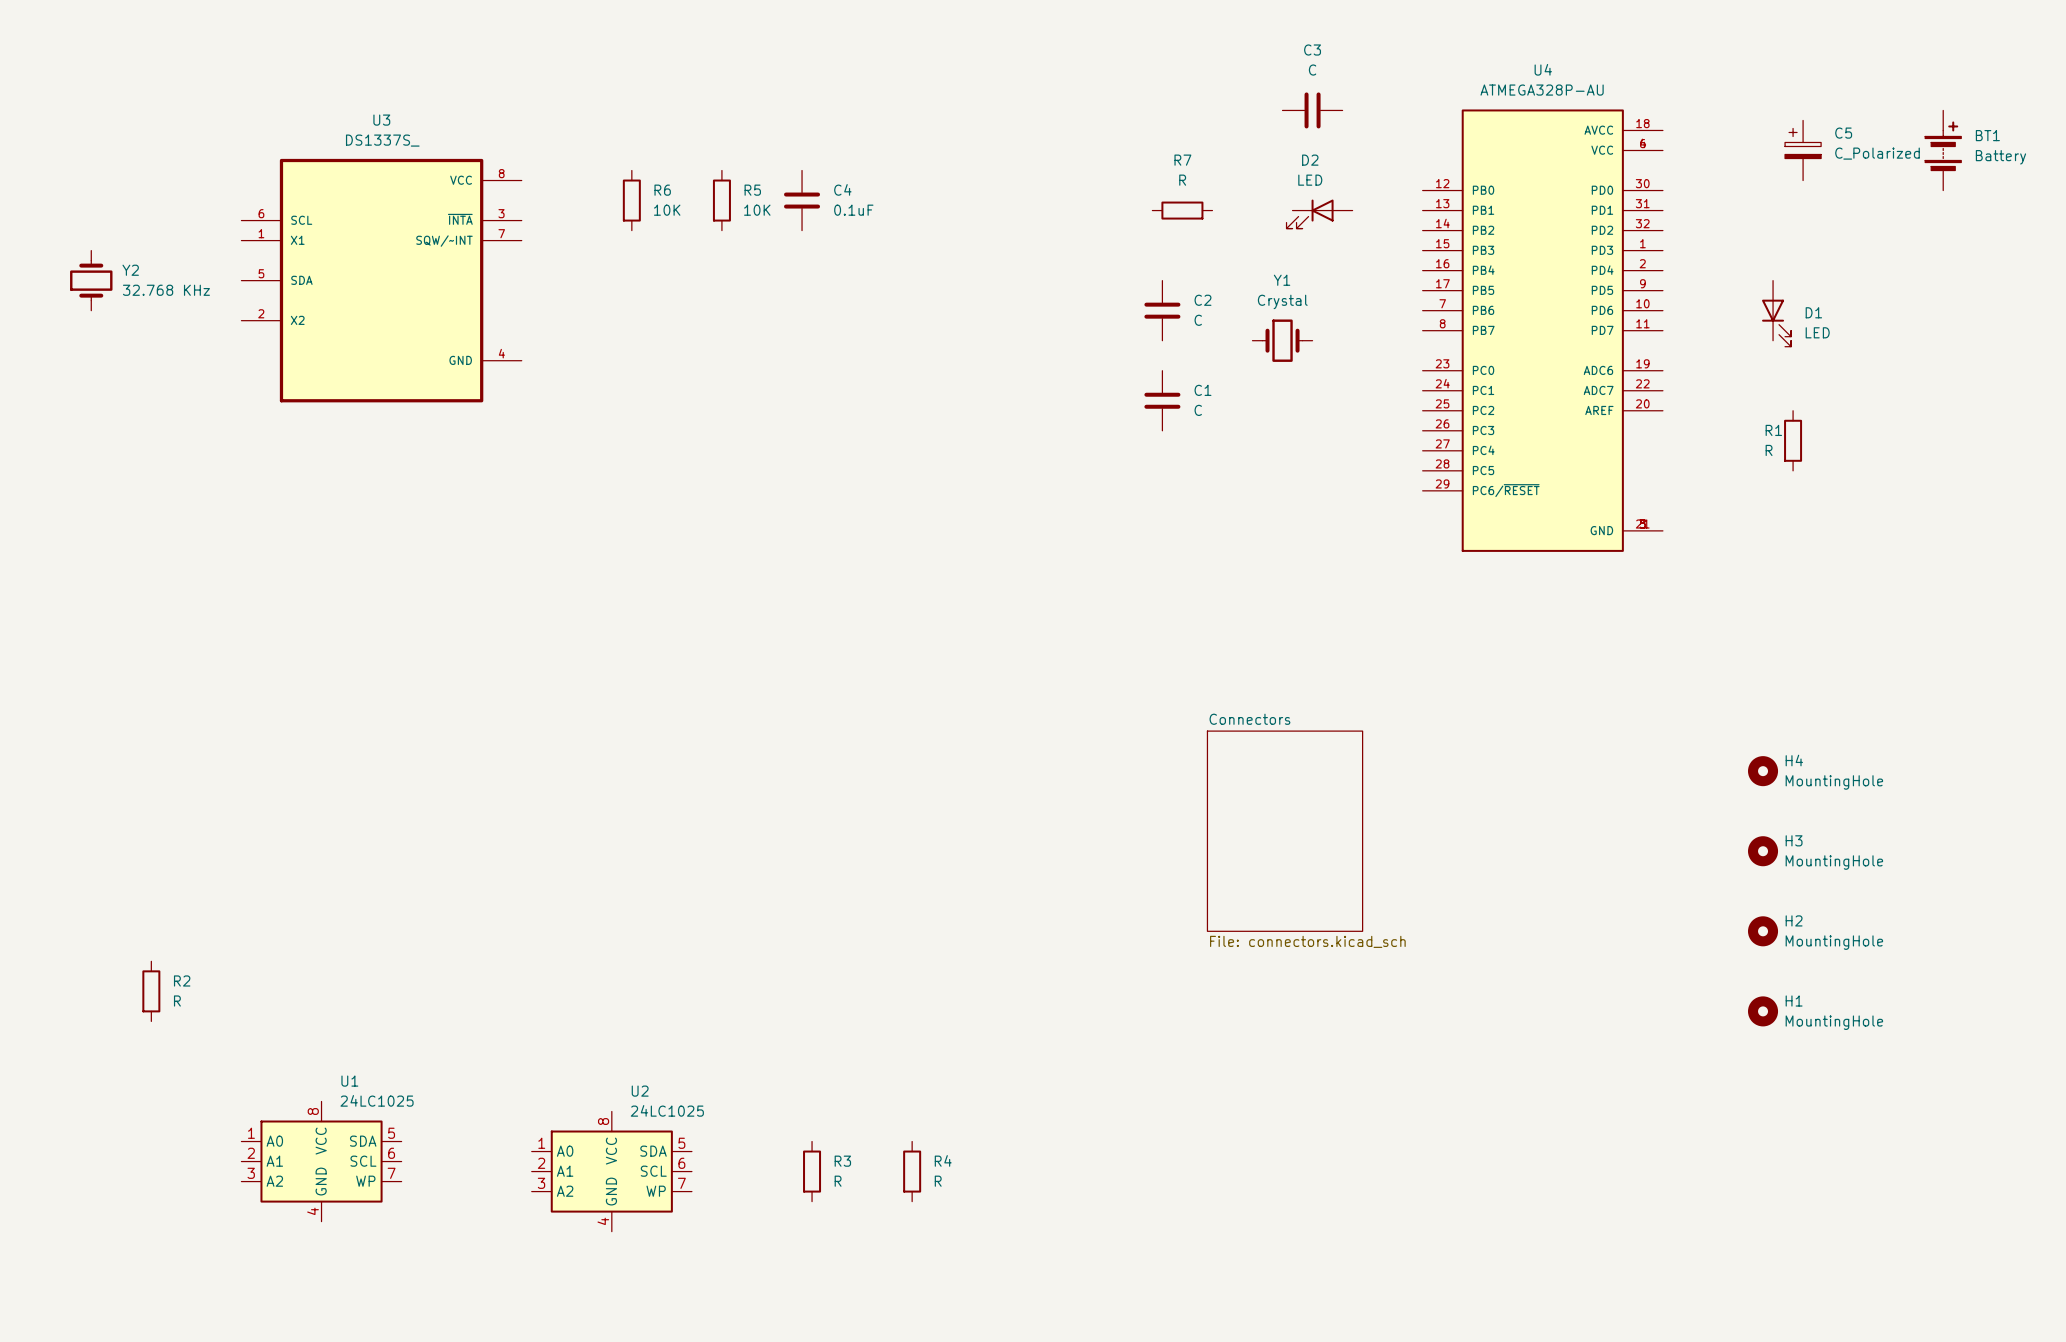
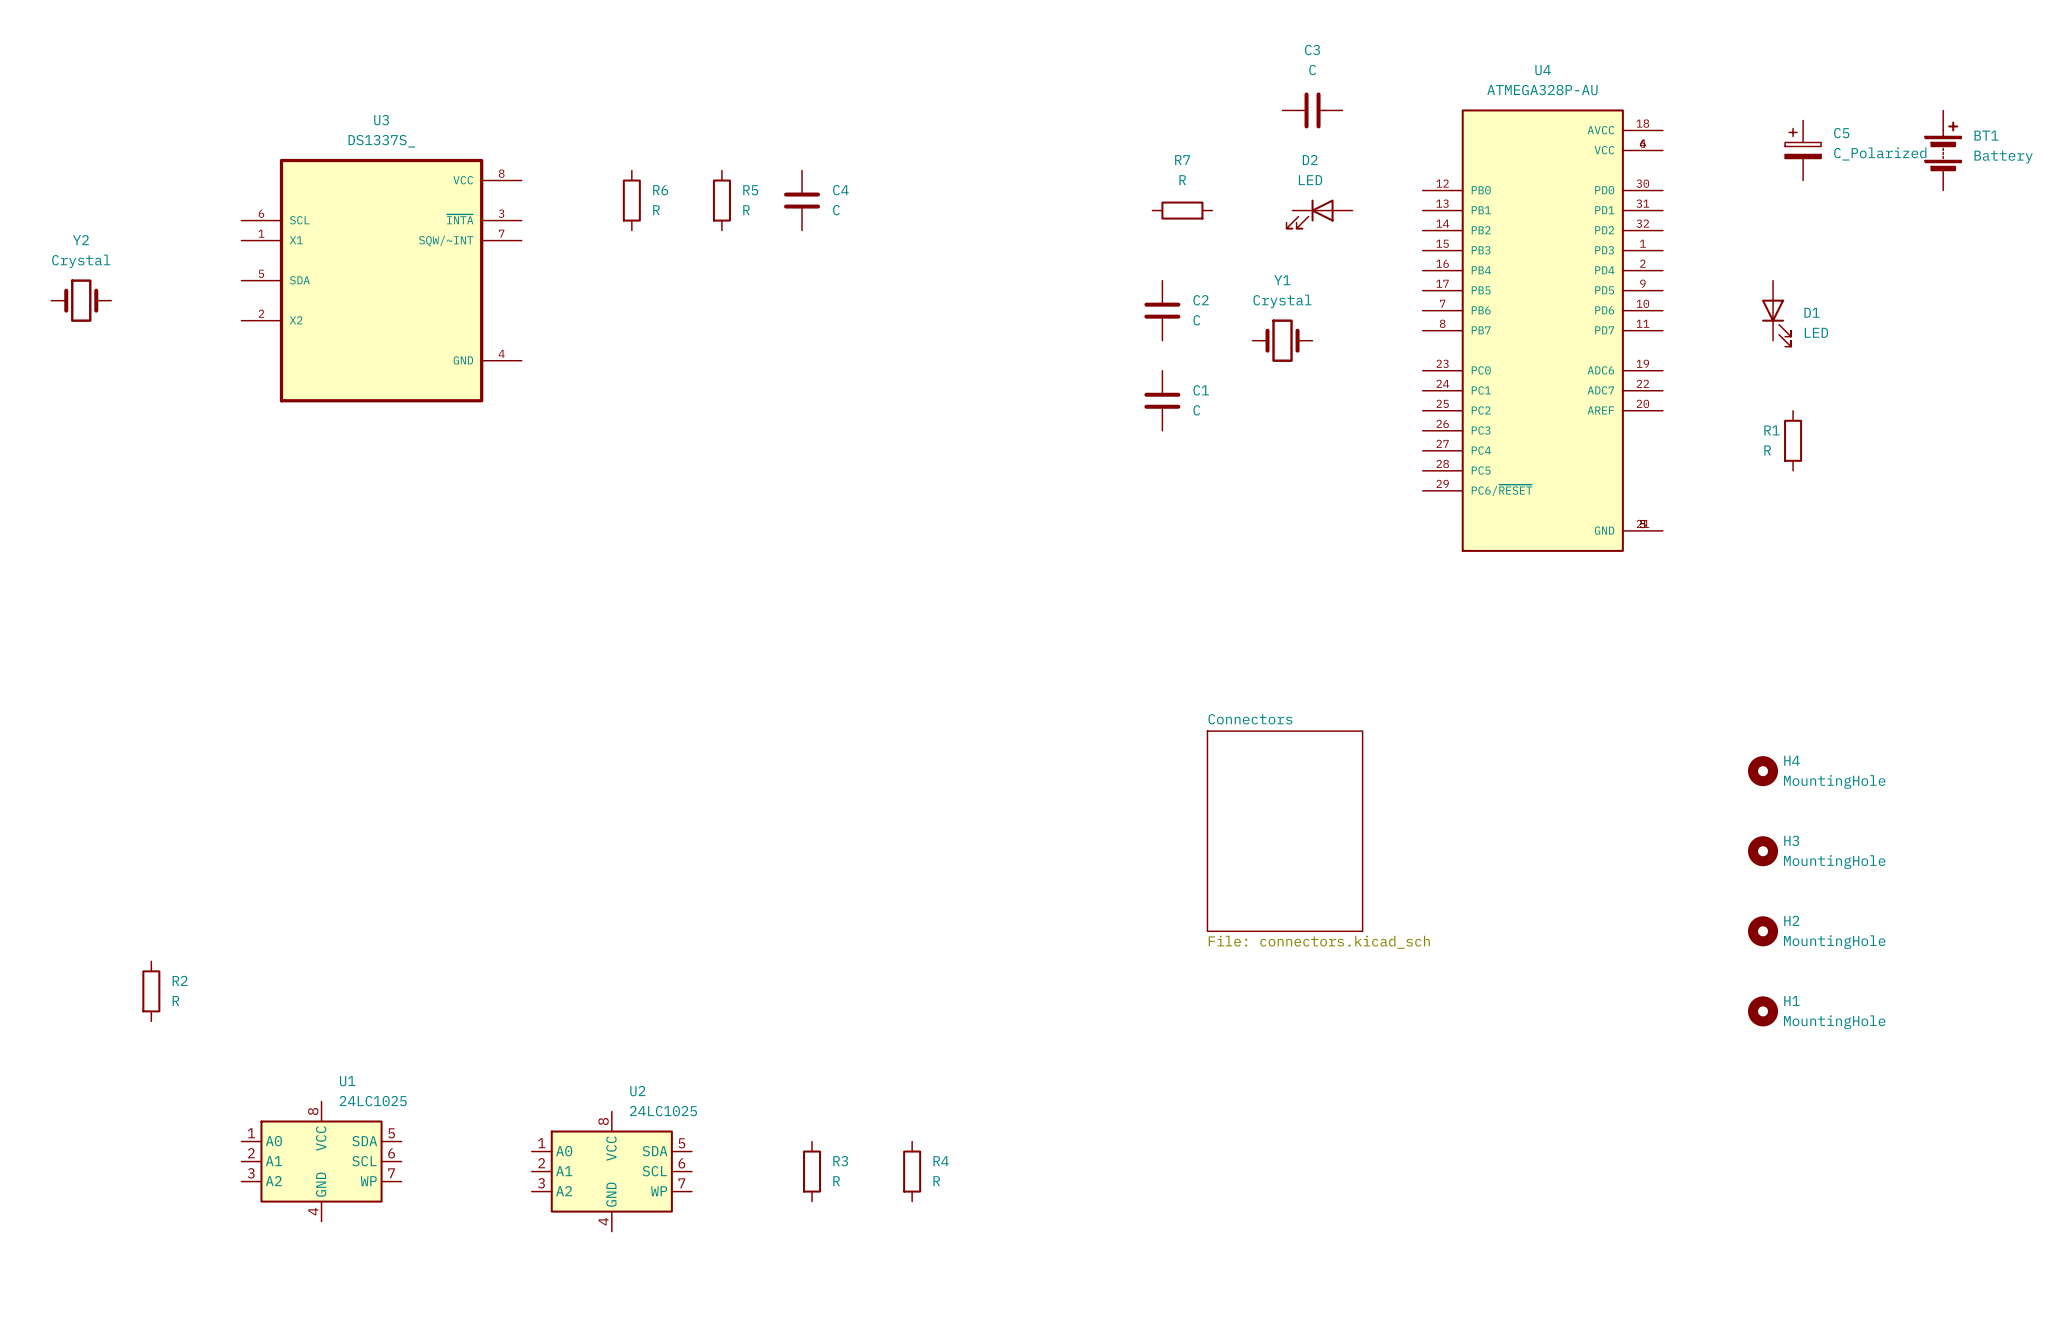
R6 value: 10K (667, 210) -> R (656, 210)
R5 value: 10K (757, 210) -> R (746, 210)
C4 value: 0.1uF (853, 210) -> C (836, 210)
Y2 name position: Y2 (130, 270) -> Y2 (80, 240)
Y2 rotation: 0° (91, 280) -> 90° clockwise (81, 300)
Y2 value: 32.768 KHz (166, 290) -> Crystal (81, 261)

